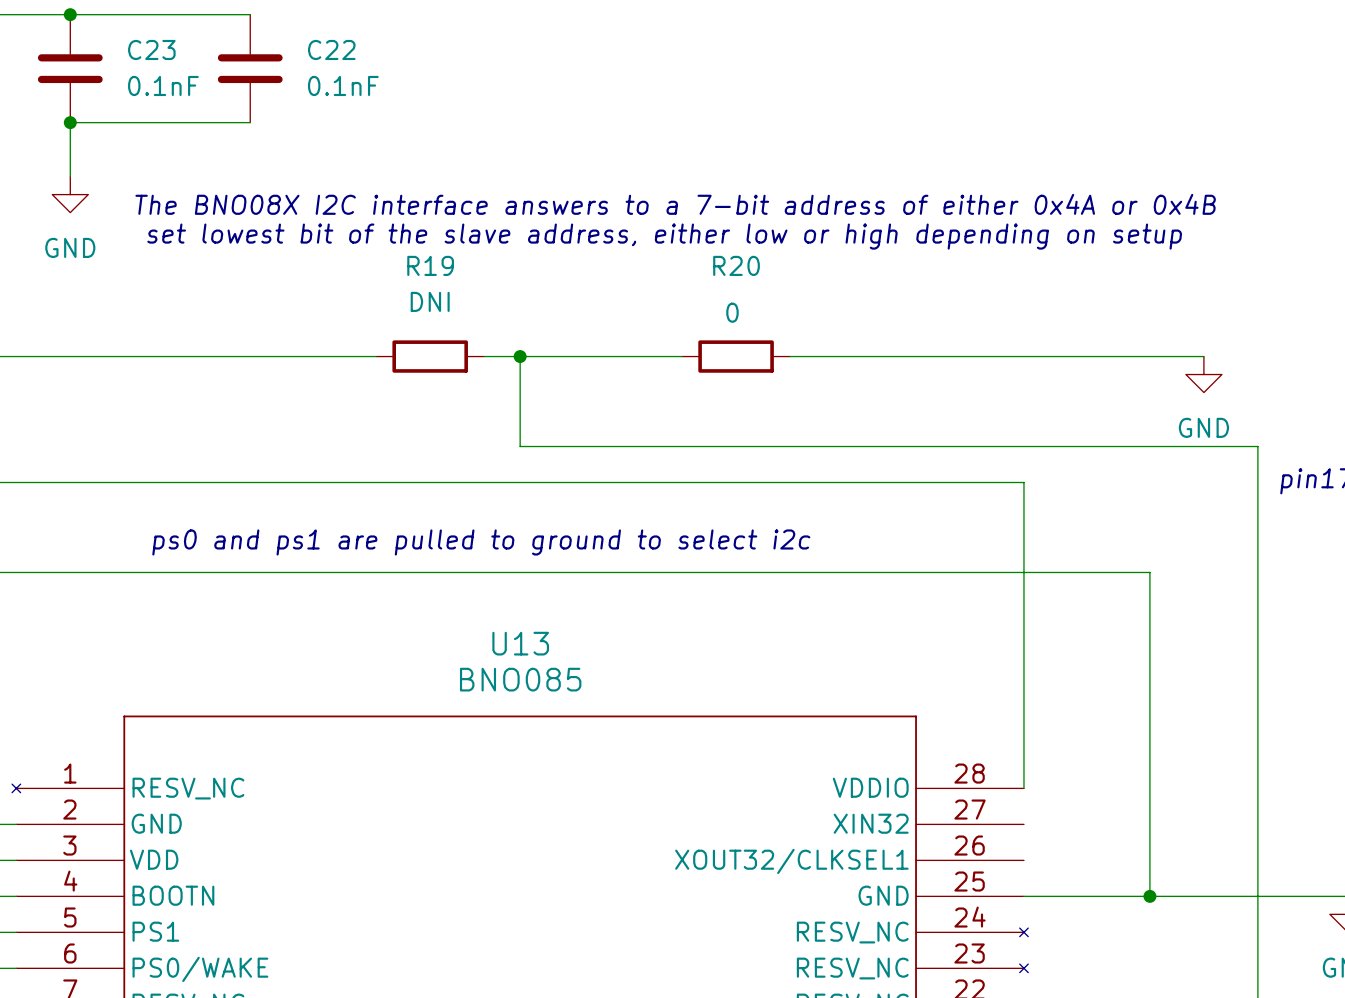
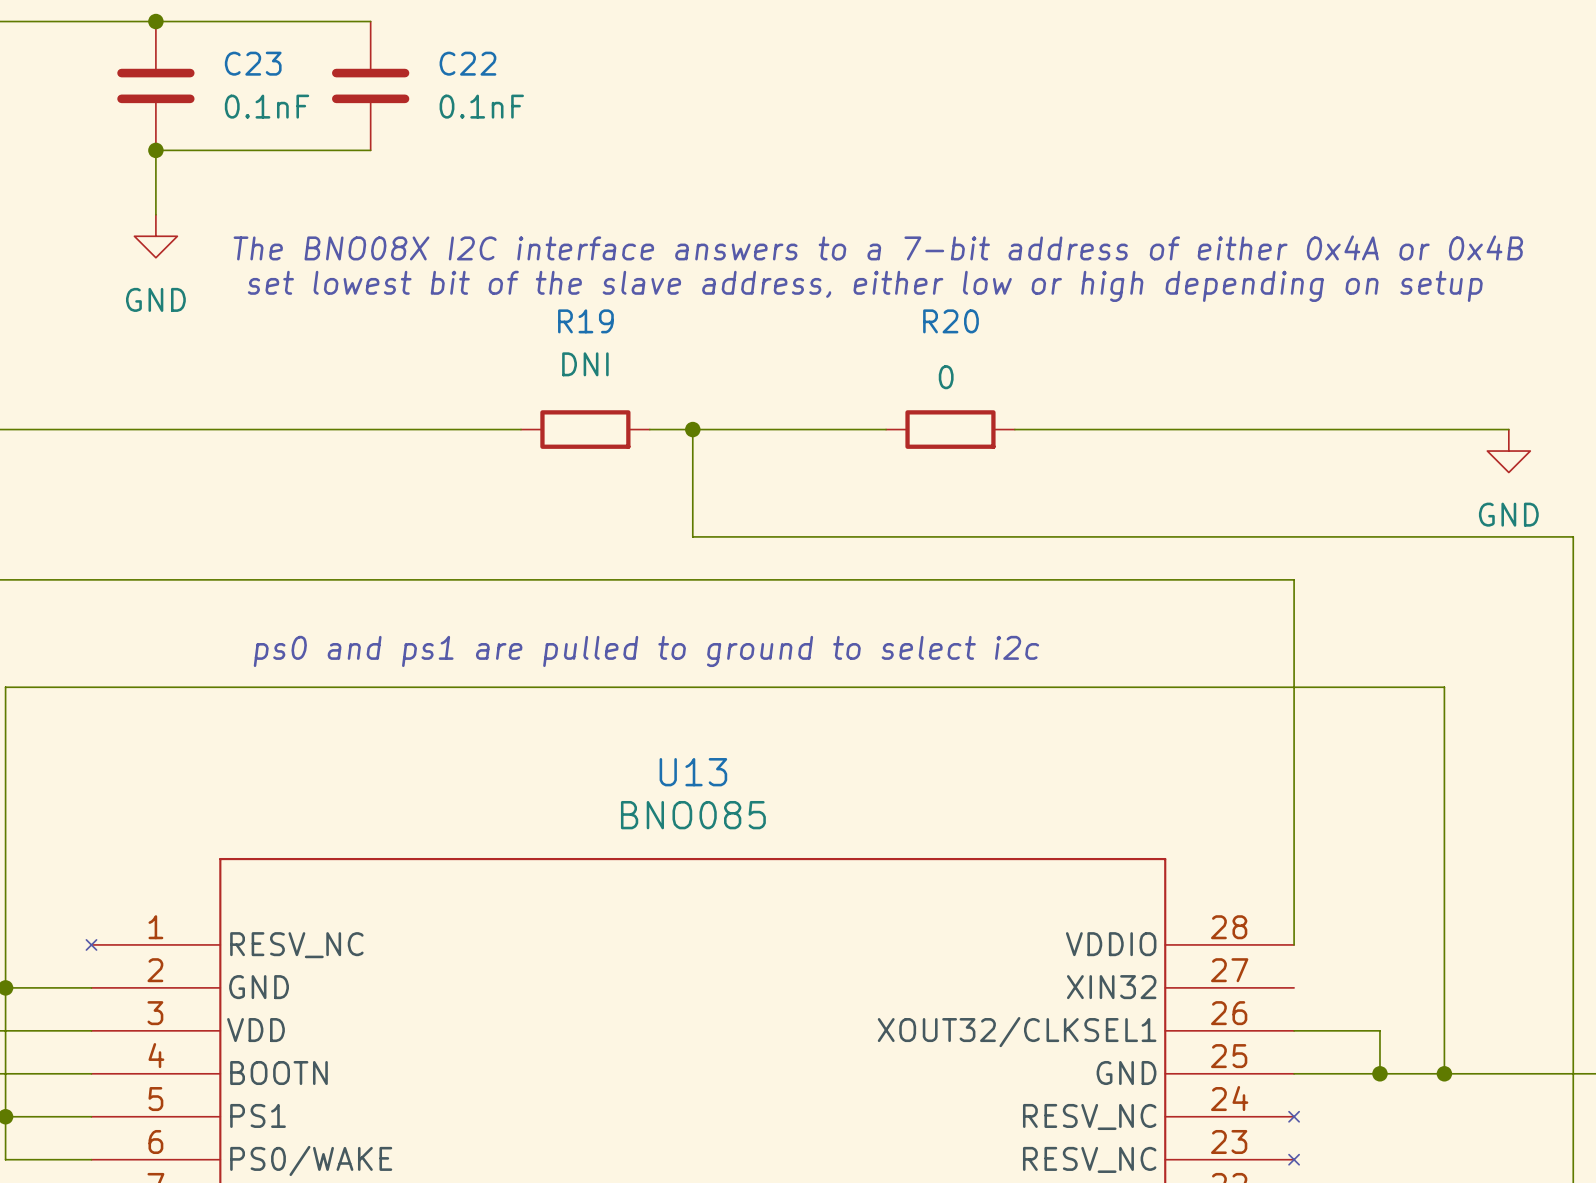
wire: none -> (1294, 1030) (1379, 1030) (1379, 1073)
junction: none -> (1379, 1073)

